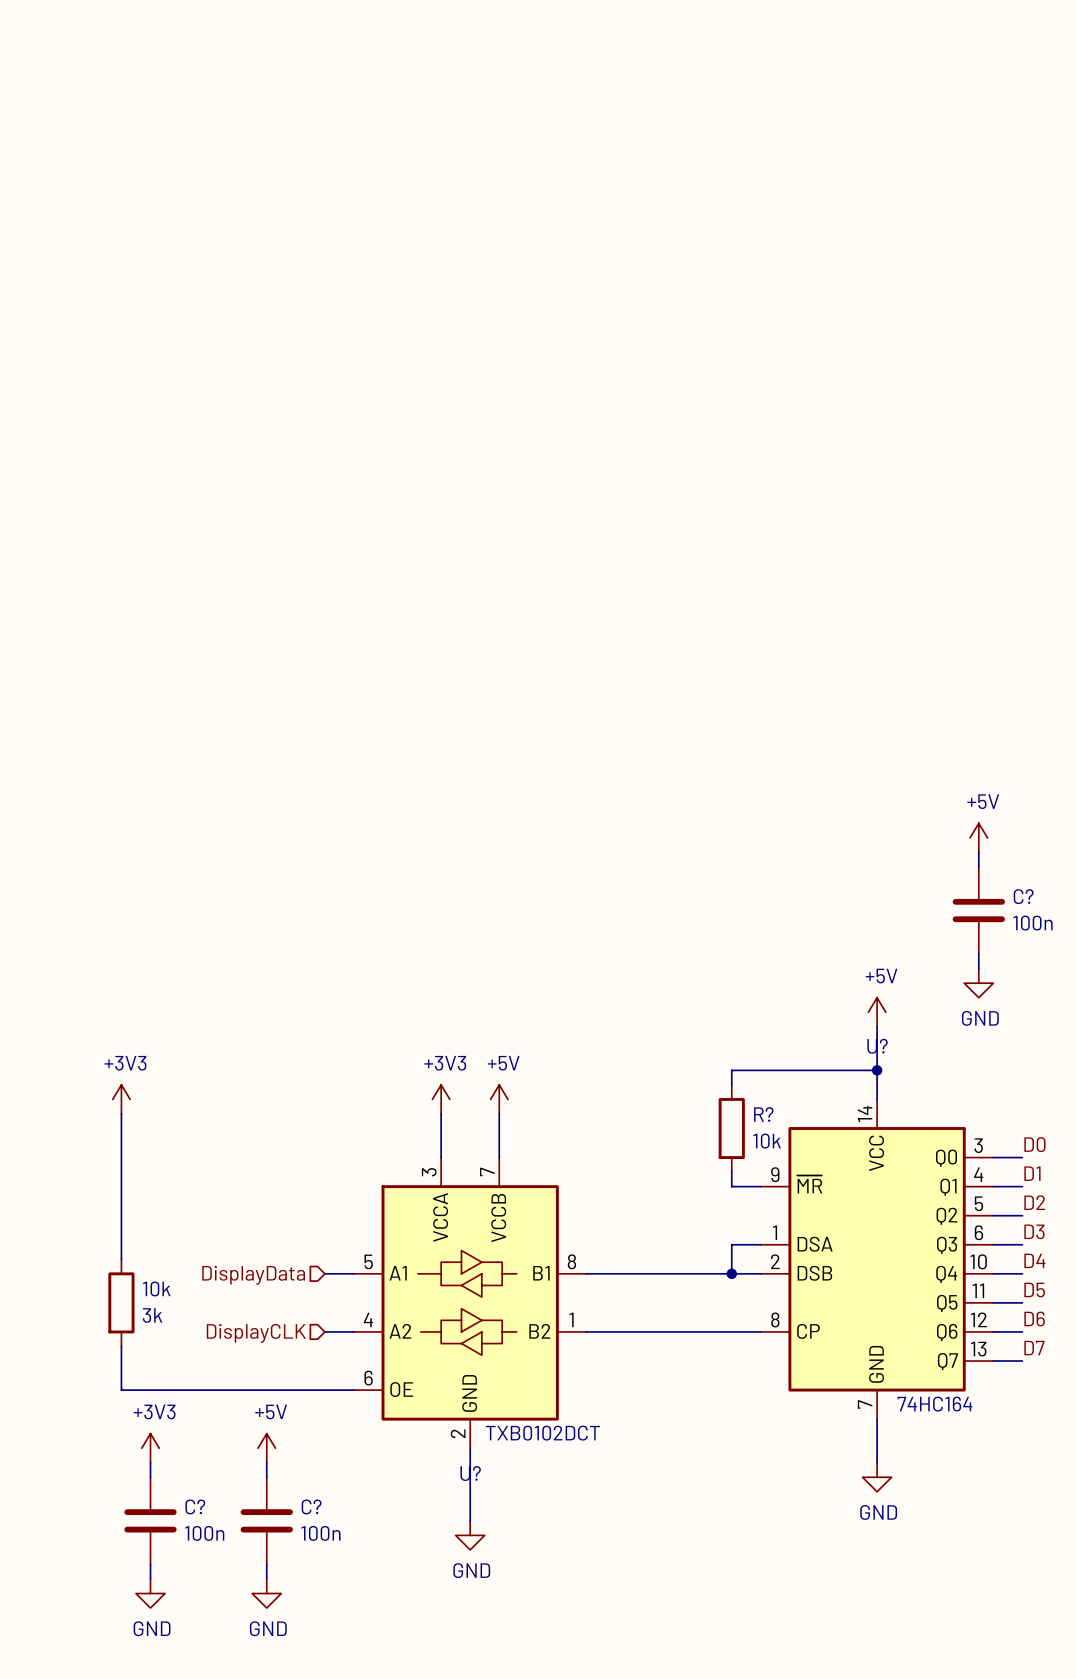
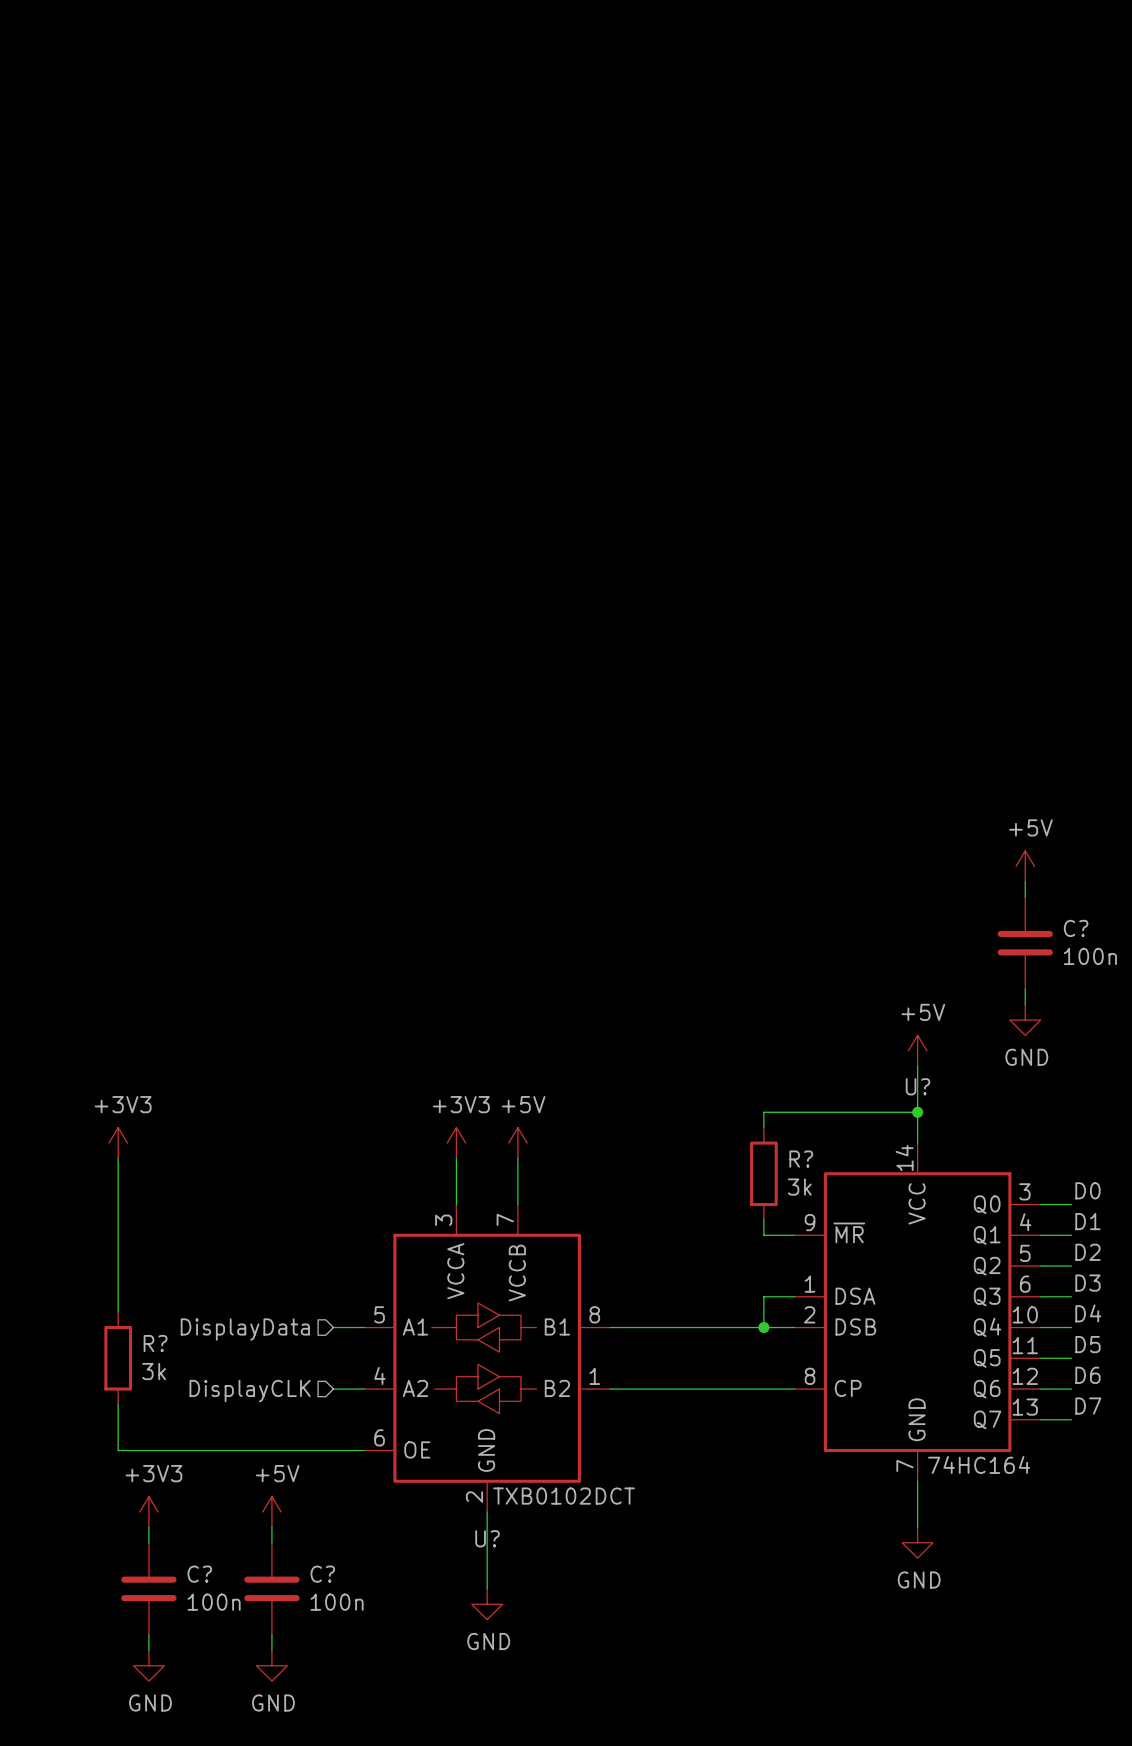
R? value: 10k (767, 1141) -> 3k (799, 1187)
10k name: 10k (156, 1288) -> R? (155, 1343)

